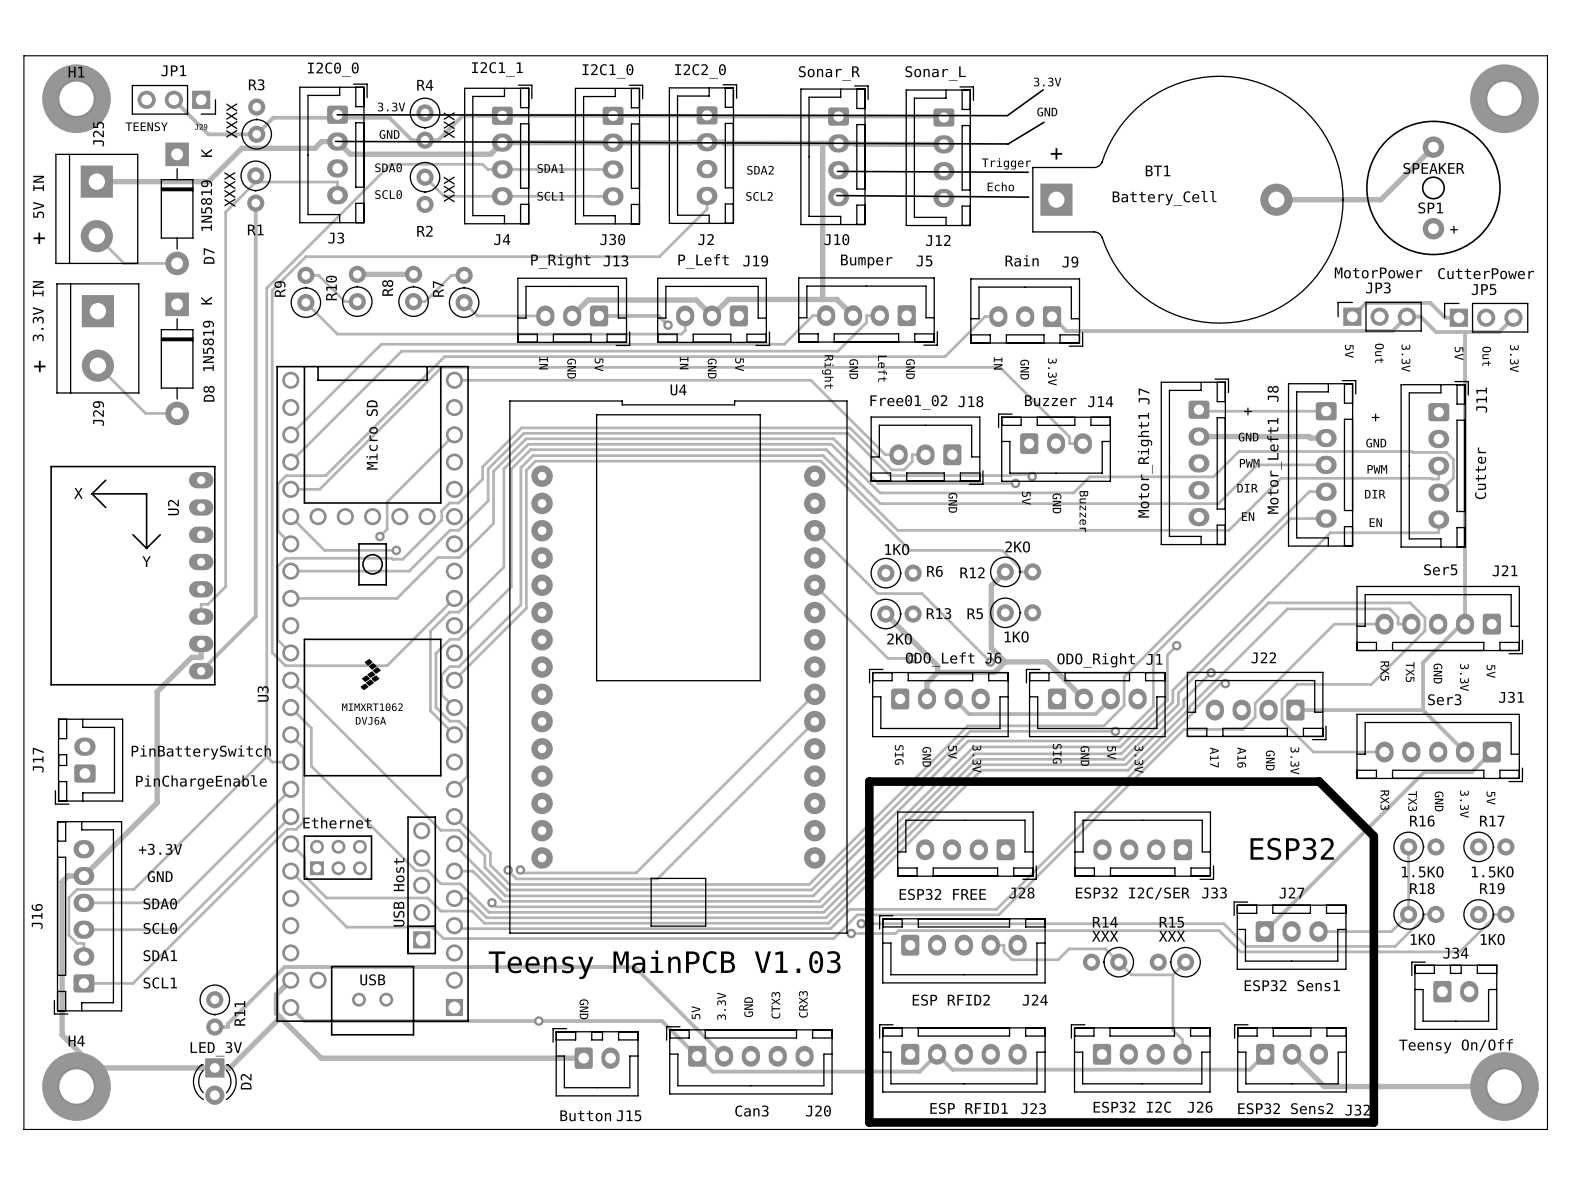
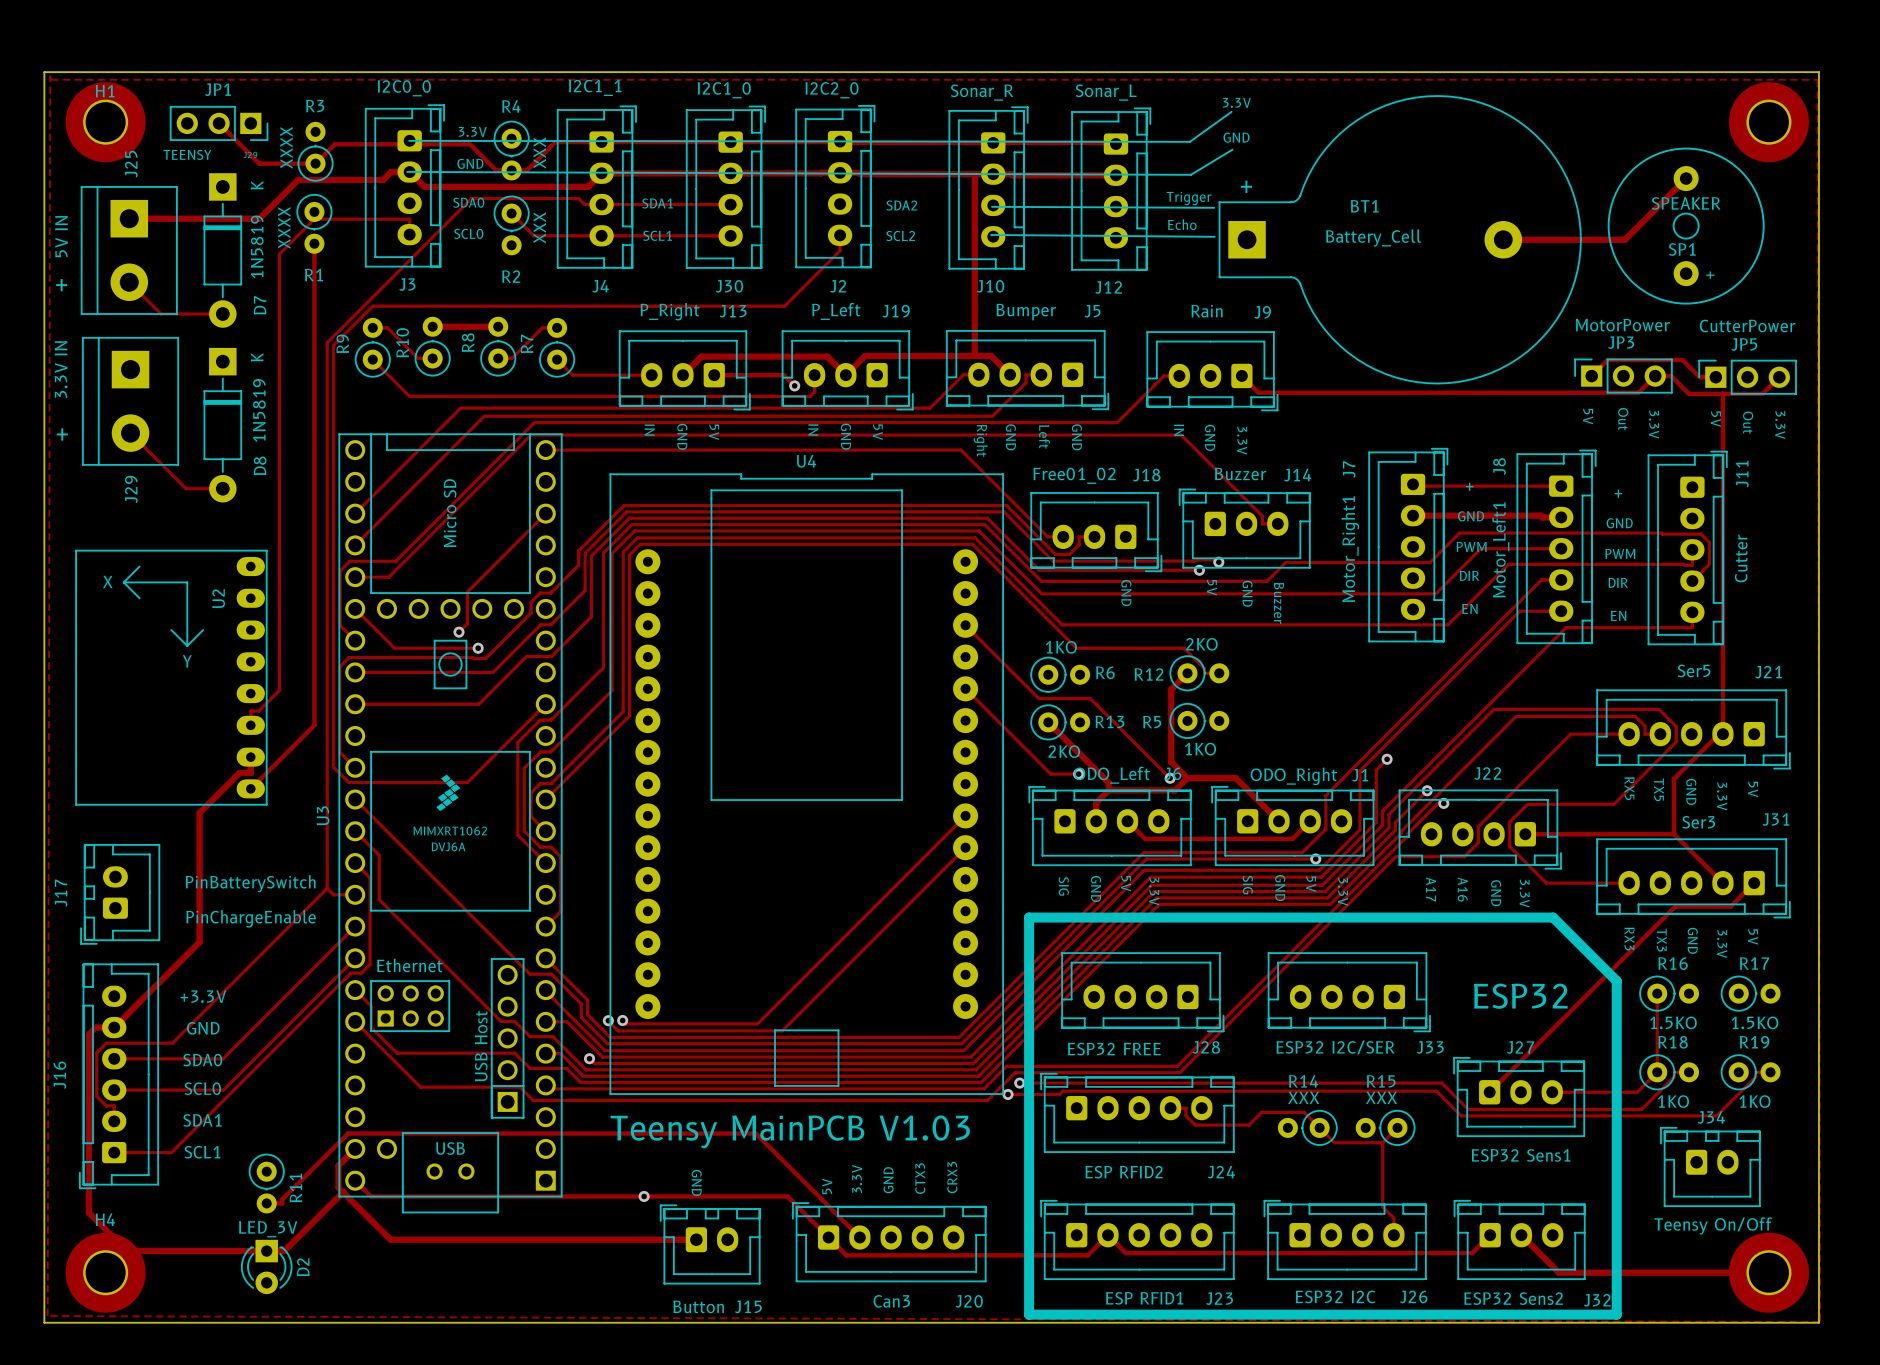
zone outline: none -> (50, 75) (47, 1315) (1820, 1322) (1817, 79) (51, 79) (50, 75)

